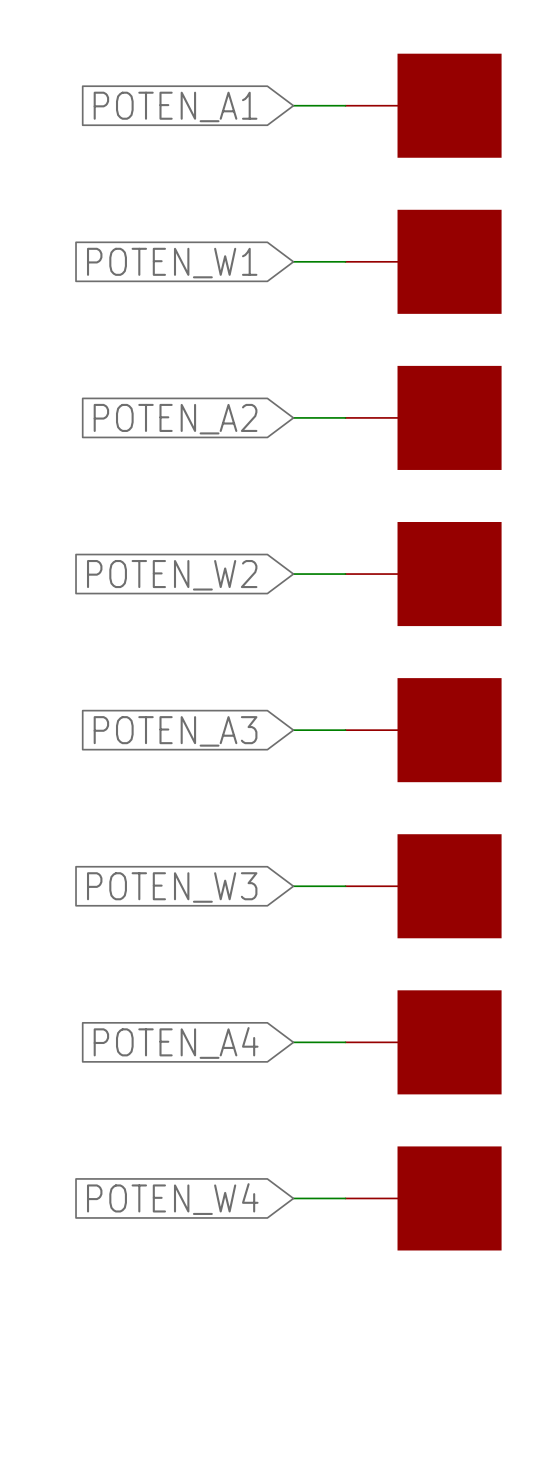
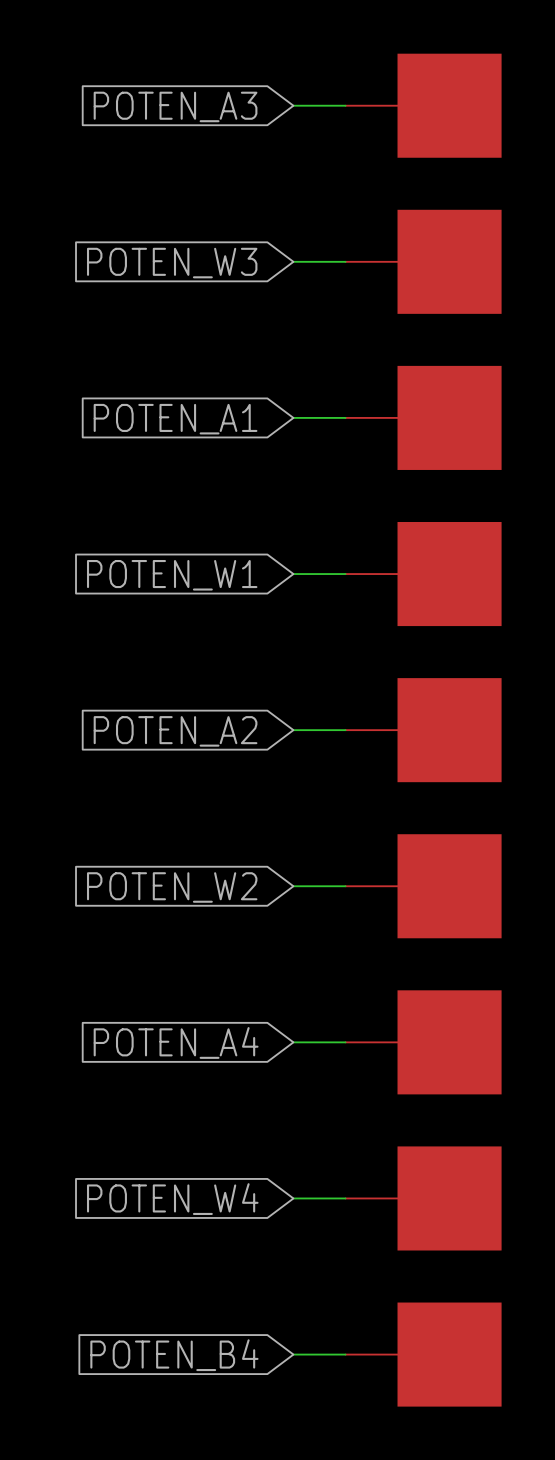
global label: POTEN_A1 (175, 106) -> POTEN_A3 (175, 106)
global label: POTEN_W1 (172, 263) -> POTEN_W3 (172, 263)
global label: POTEN_A2 (175, 419) -> POTEN_A1 (175, 419)
global label: POTEN_W2 (172, 575) -> POTEN_W1 (172, 575)
global label: POTEN_A3 (175, 731) -> POTEN_A2 (175, 731)
global label: POTEN_W3 (172, 887) -> POTEN_W2 (172, 887)
wire: none -> (293, 1354) (345, 1354)
part: none -> (423, 1354)
global label: none -> POTEN_B4 (174, 1355)

